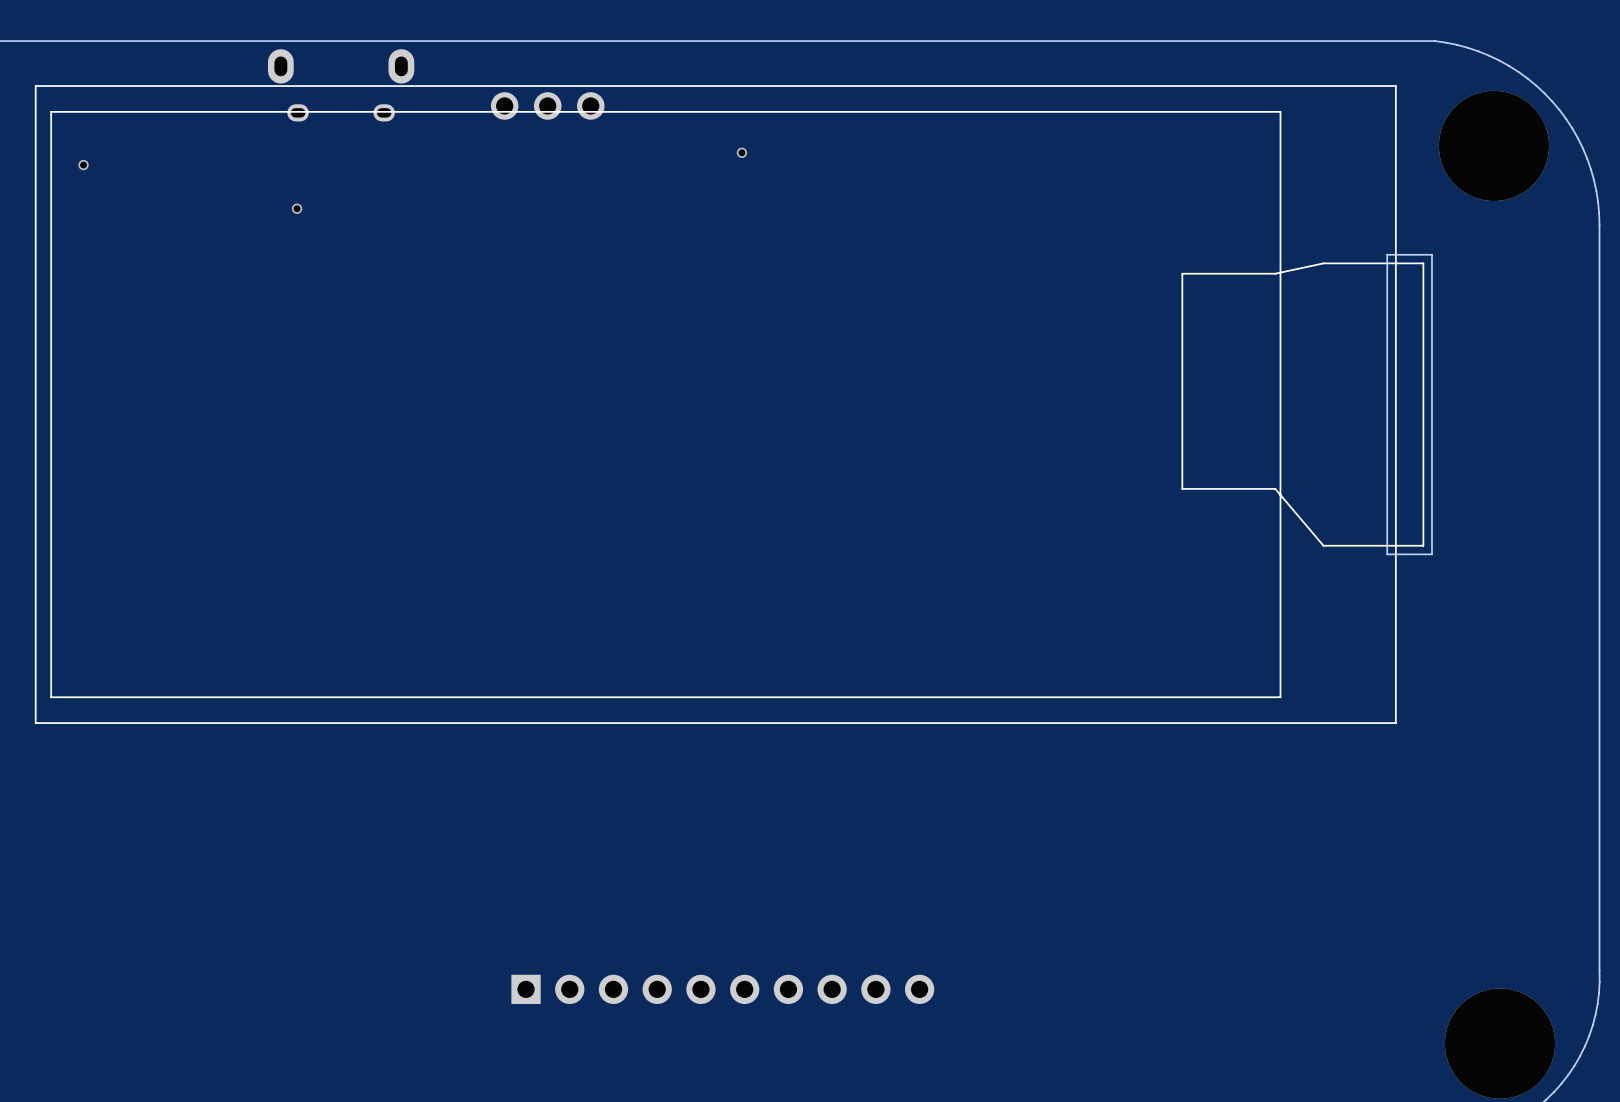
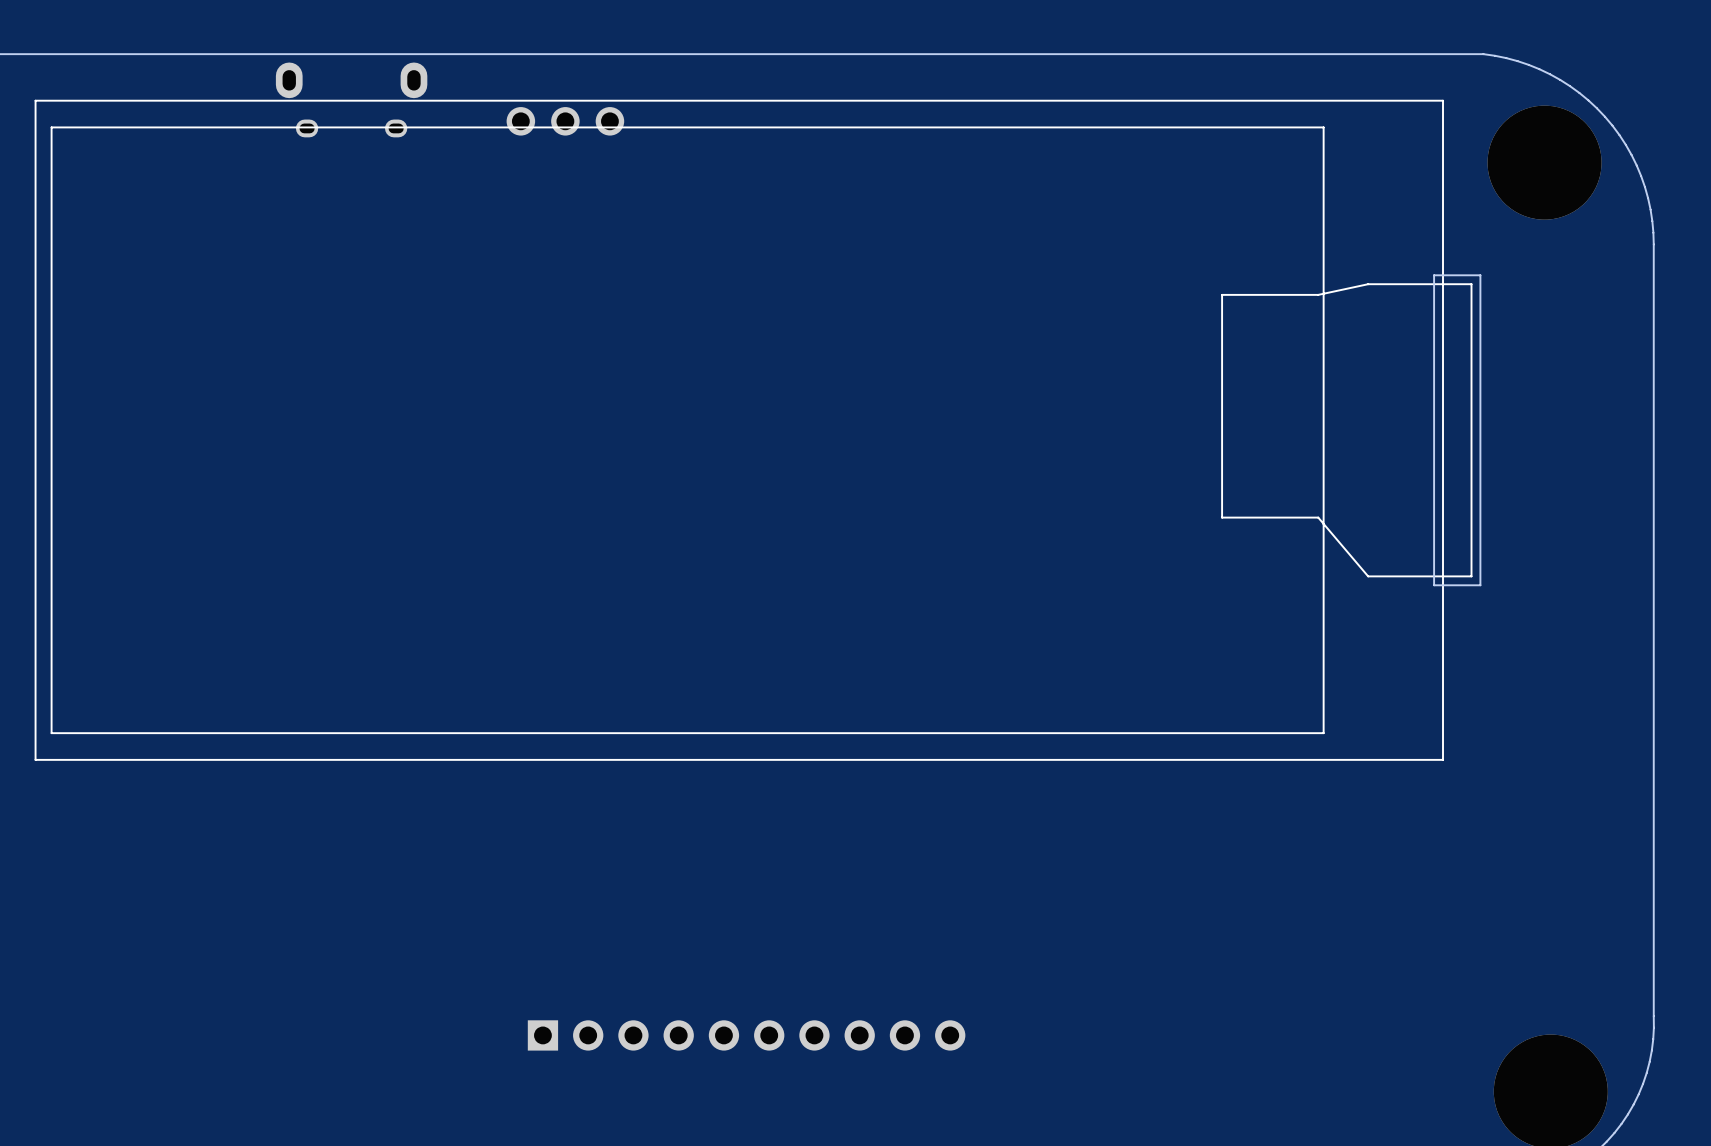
via: (741, 152) -> none
via: (83, 165) -> none
via: (297, 208) -> none

